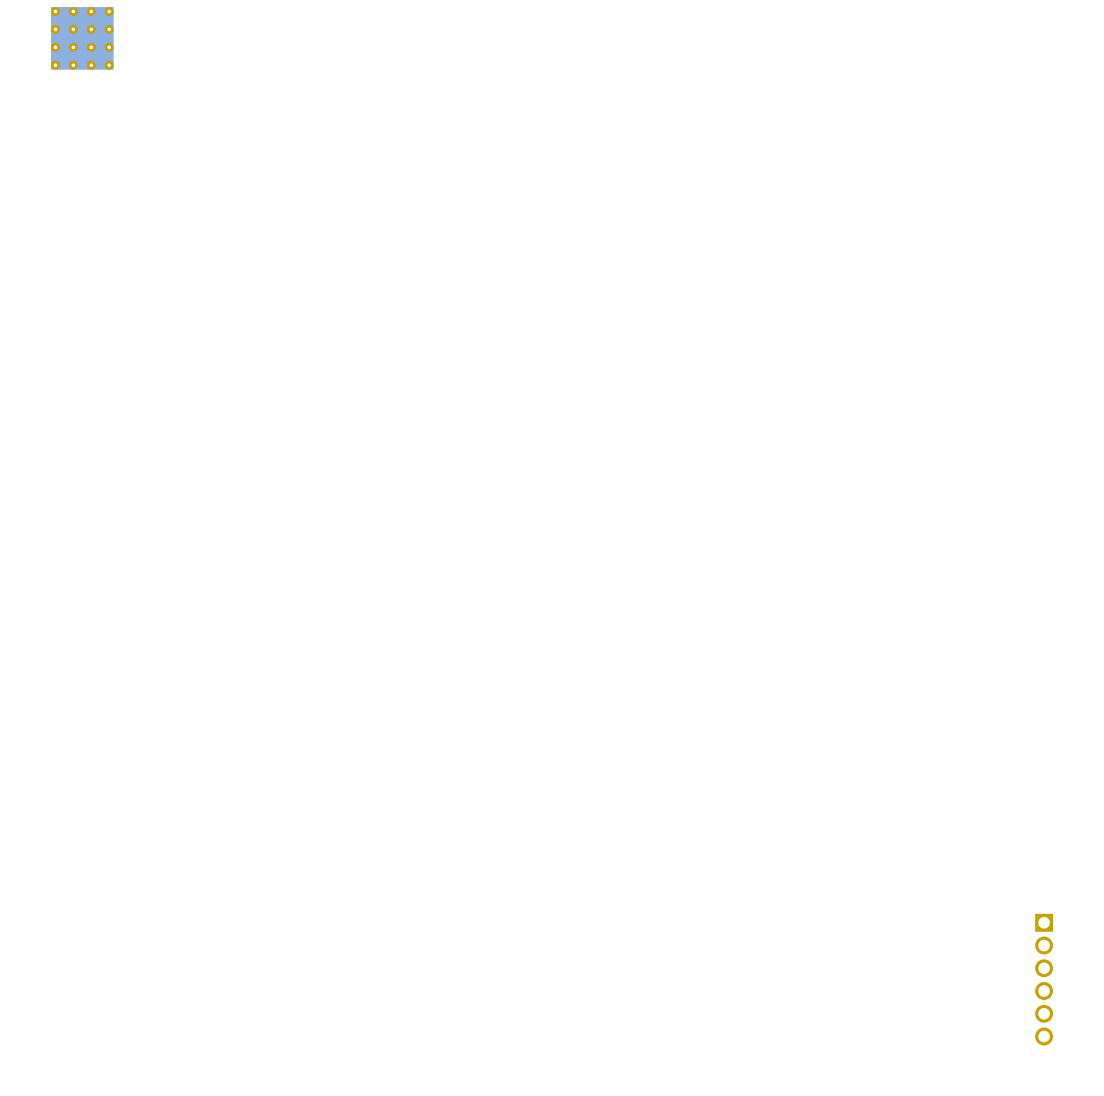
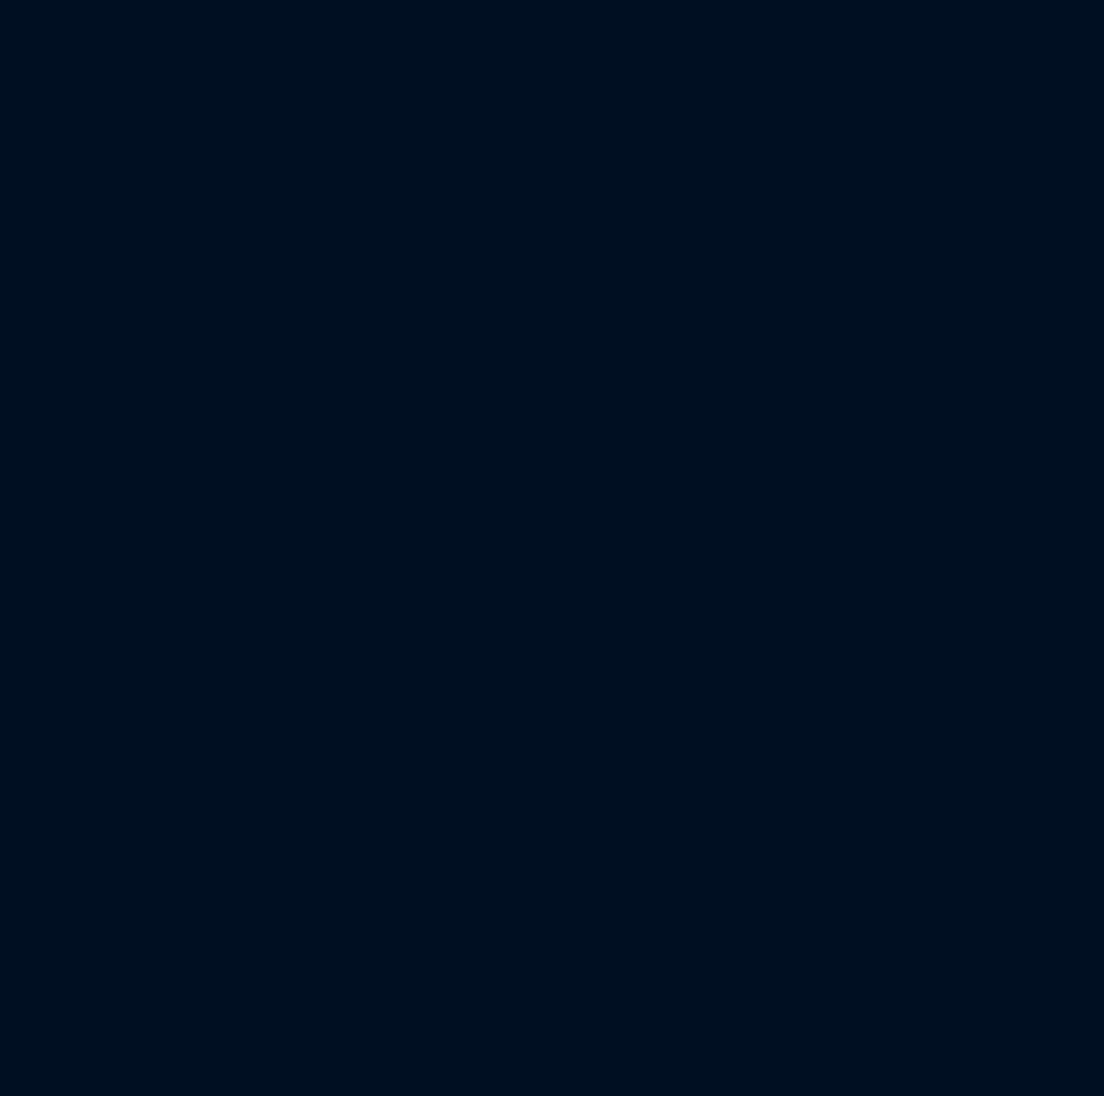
part: (82, 38) -> none
part: (1044, 979) -> none

